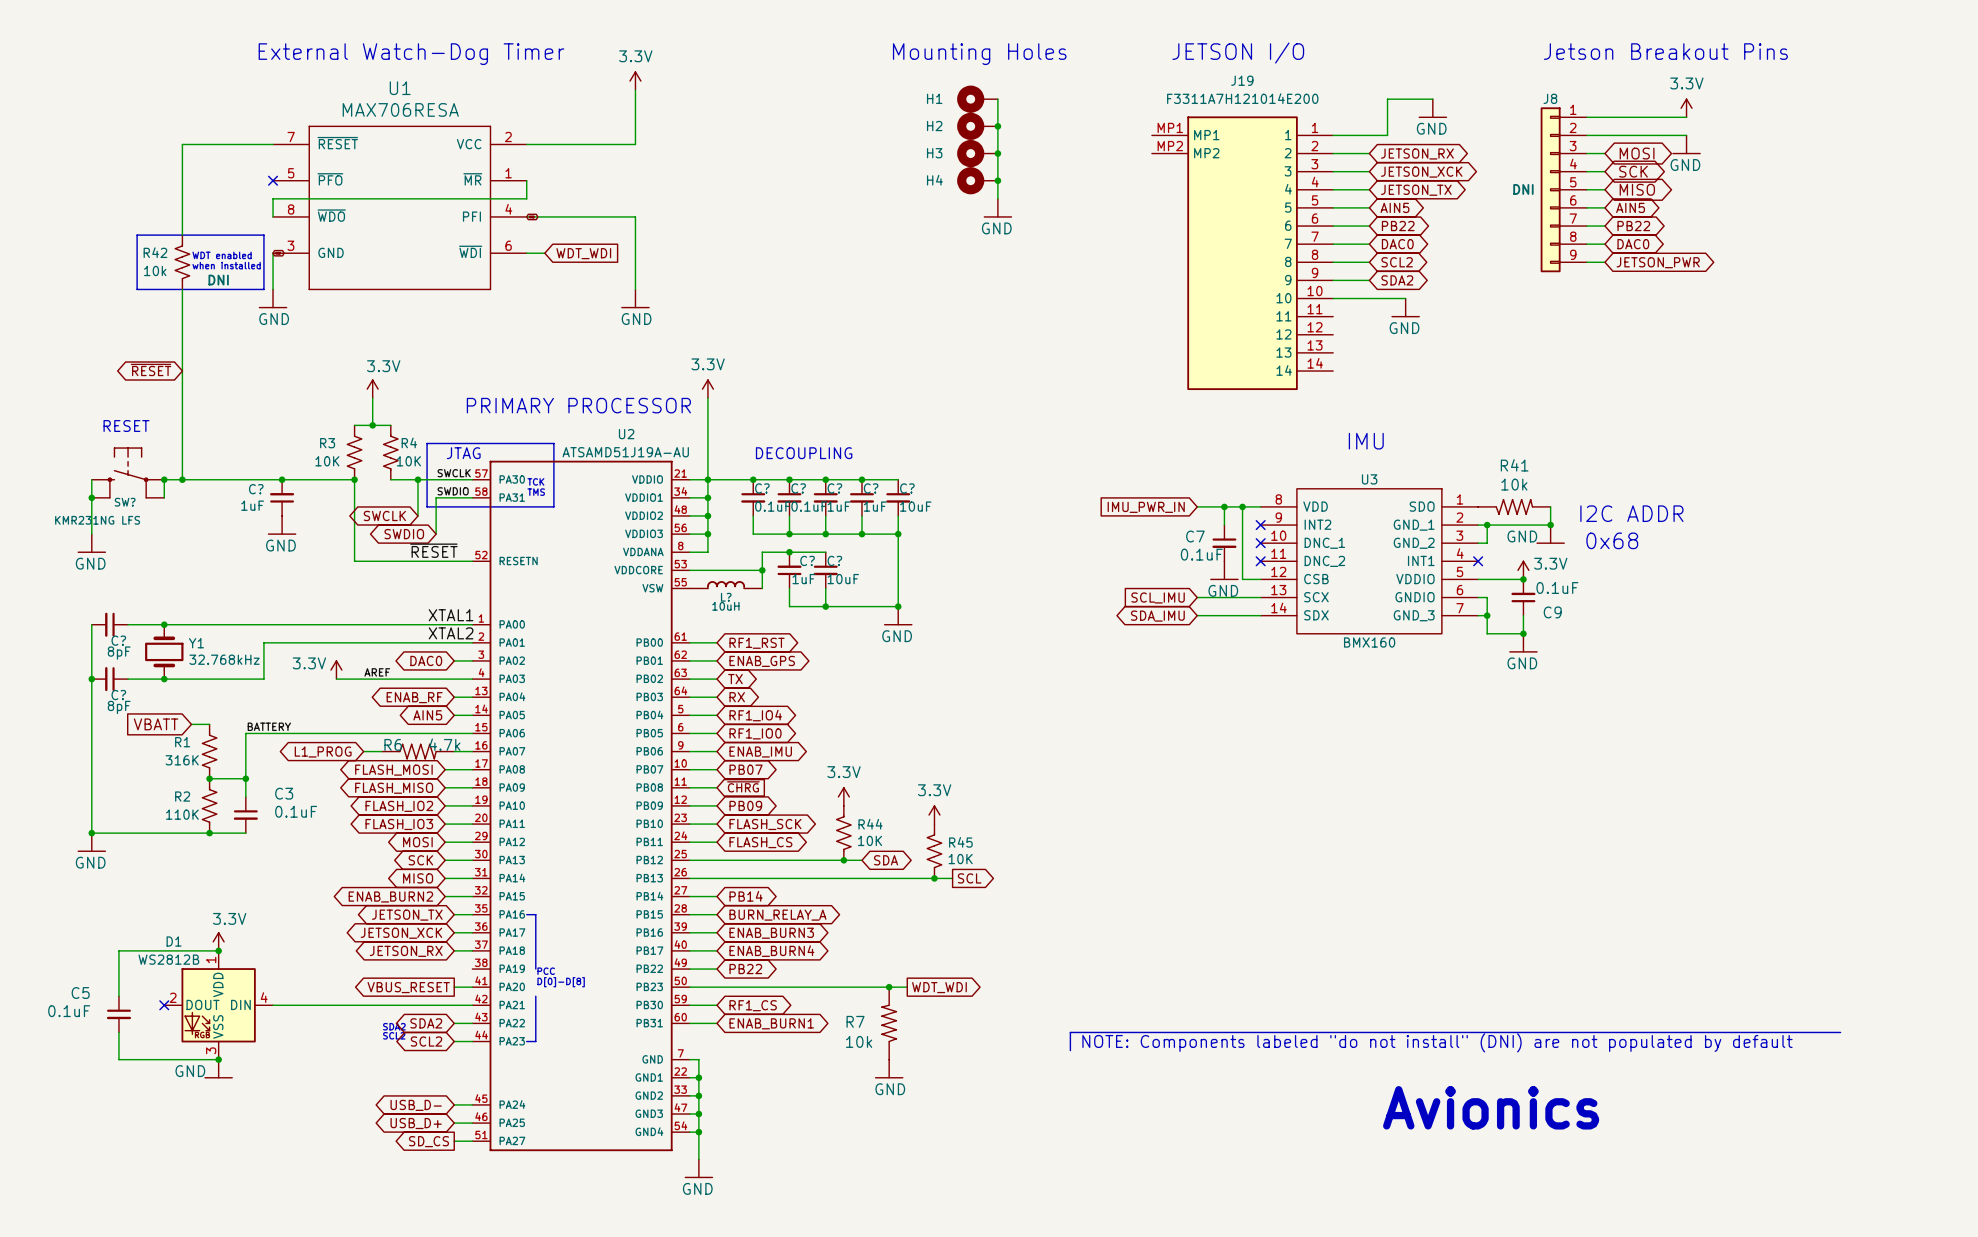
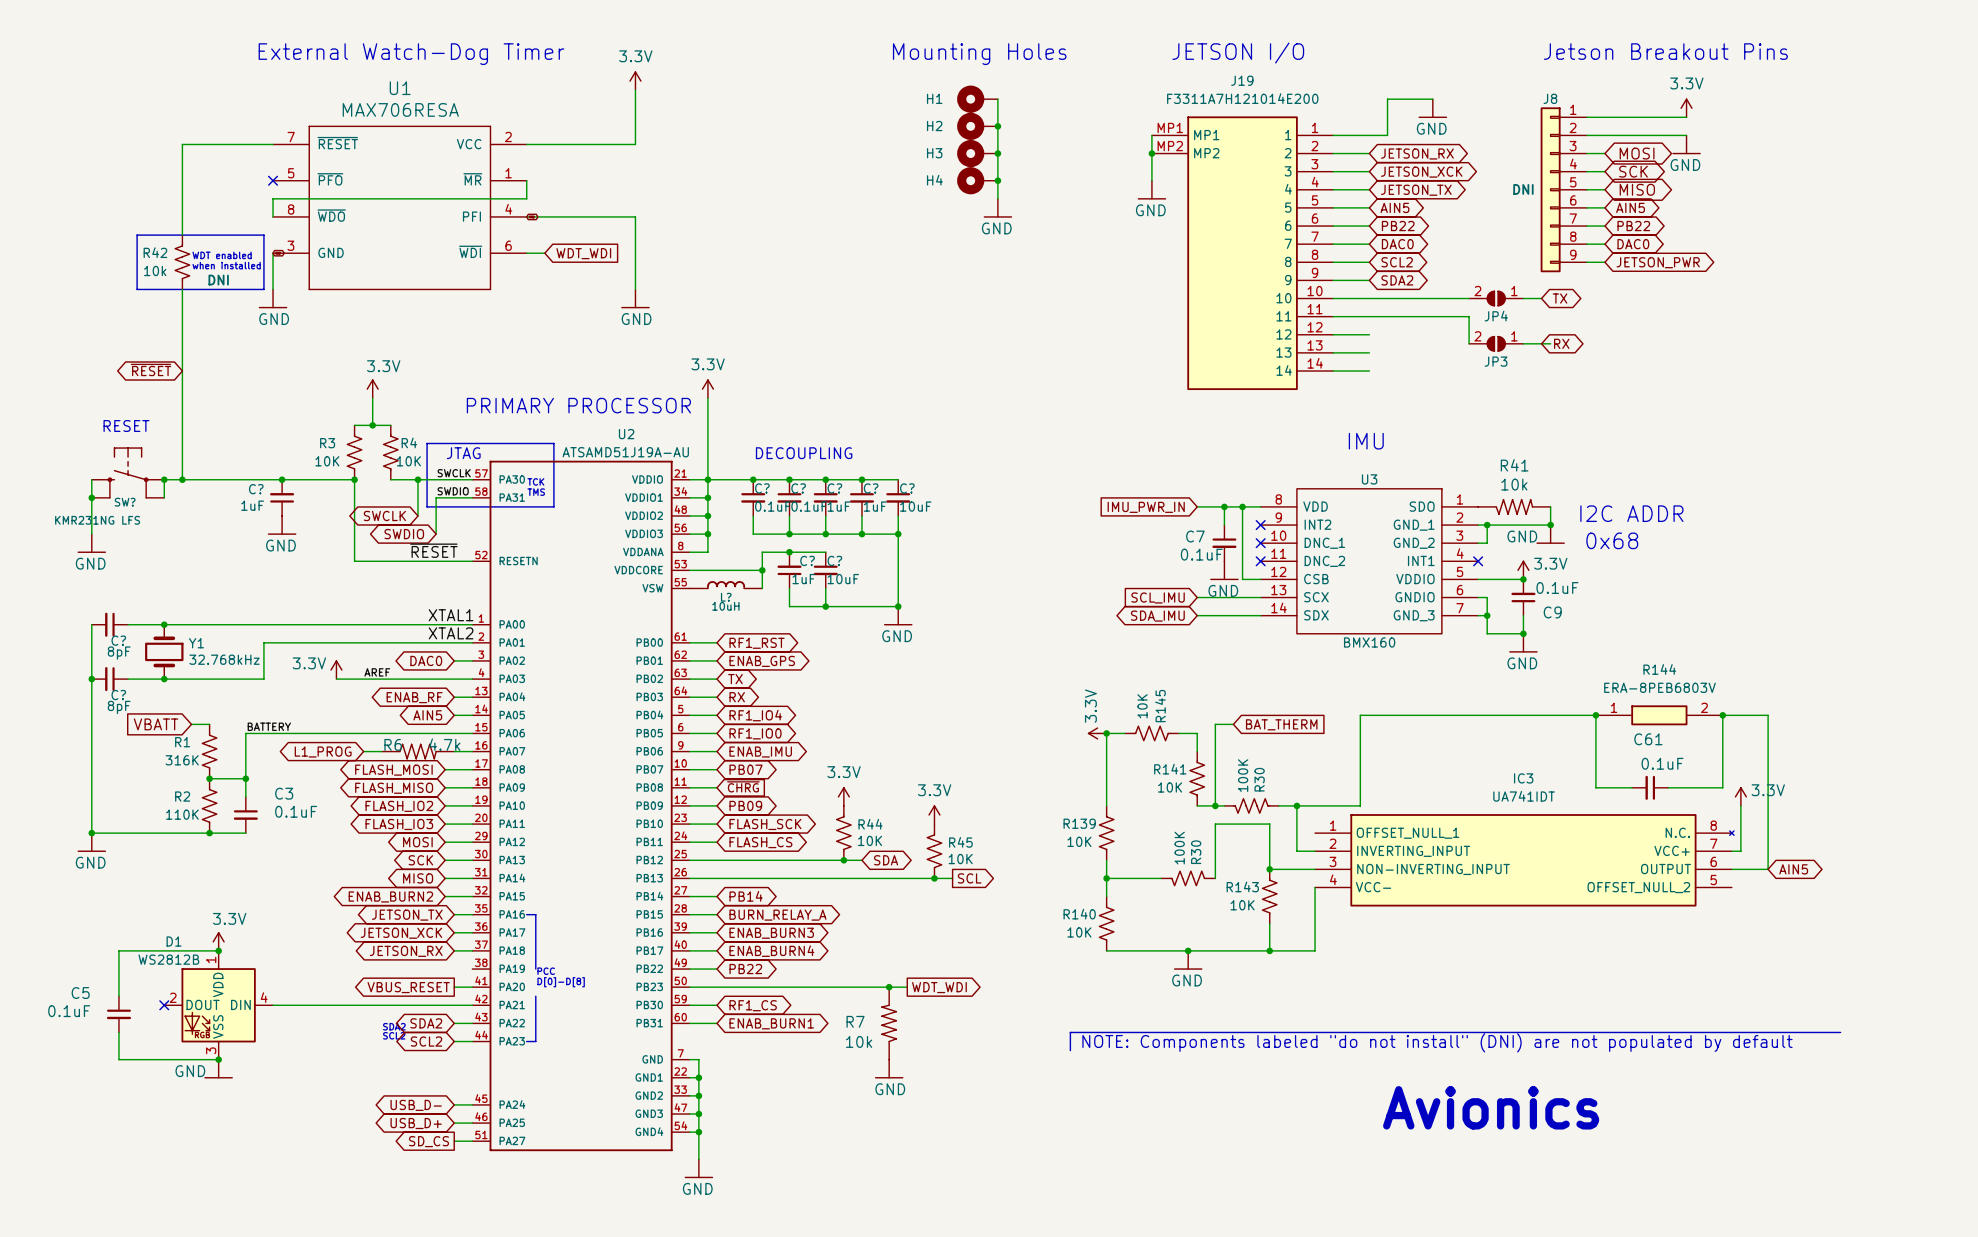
wire: none -> (1151, 135) (1151, 180)
junction: none -> (1151, 153)
power symbol: none -> GND (1151, 189)
wire: none -> (1405, 298) (1469, 298)
JP4: none -> (1496, 298)
wire: none -> (1523, 298) (1541, 298)
global label: none -> TX (1560, 298)
power symbol: GND (1405, 307) -> none
wire: none -> (1333, 316) (1469, 316) (1469, 343)
wire: none -> (1333, 334) (1369, 334)
JP3: none -> (1496, 343)
wire: none -> (1523, 343) (1550, 343)
global label: none -> RX (1561, 343)
wire: none -> (1333, 352) (1369, 352)
wire: none -> (1333, 371) (1369, 371)
junction: none -> (1595, 715)
R144: none -> ERA-8PEB6803V (1659, 715)
junction: none -> (1722, 715)
wire: none -> (1233, 724) (1215, 724) (1215, 805)
global label: none -> BAT_THERM (1281, 724)
power symbol: none -> 3.3V (1097, 733)
junction: none -> (1106, 733)
wire: none -> (1124, 733) (1106, 733) (1106, 805)
R145: none -> 10K (1151, 733)
wire: none -> (1179, 733) (1197, 733) (1197, 751)
R141: none -> 10K (1197, 778)
wire: none -> (1632, 787) (1595, 787) (1595, 715) (1360, 715) (1360, 805) (1278, 805)
C61: none -> 0.1uF (1650, 787)
wire: none -> (1668, 787) (1722, 787) (1722, 715) (1768, 715) (1768, 869) (1731, 869)
power symbol: none -> 3.3V (1740, 796)
wire: none -> (1197, 805) (1224, 805)
junction: none -> (1215, 805)
R30: none -> 100K (1251, 805)
wire: none -> (1296, 805) (1296, 851) (1315, 851)
junction: none -> (1296, 805)
wire: none -> (1740, 805) (1740, 851) (1731, 851)
R139: none -> 10K (1106, 833)
wire: none -> (1106, 860) (1106, 896)
IC3: none -> UA741IDT (1524, 860)
junction: none -> (1269, 869)
wire: none -> (1315, 869) (1269, 869) (1269, 824) (1215, 824) (1215, 878)
global label: none -> AIN5 (1793, 869)
wire: none -> (1106, 878) (1161, 878)
junction: none -> (1106, 878)
R30: none -> 100K (1188, 878)
wire: none -> (1315, 887) (1315, 950) (1106, 950)
R143: none -> 10K (1269, 896)
R140: none -> 10K (1106, 923)
wire: none -> (1269, 923) (1269, 950)
junction: none -> (1188, 950)
junction: none -> (1269, 950)
power symbol: none -> GND (1188, 959)

